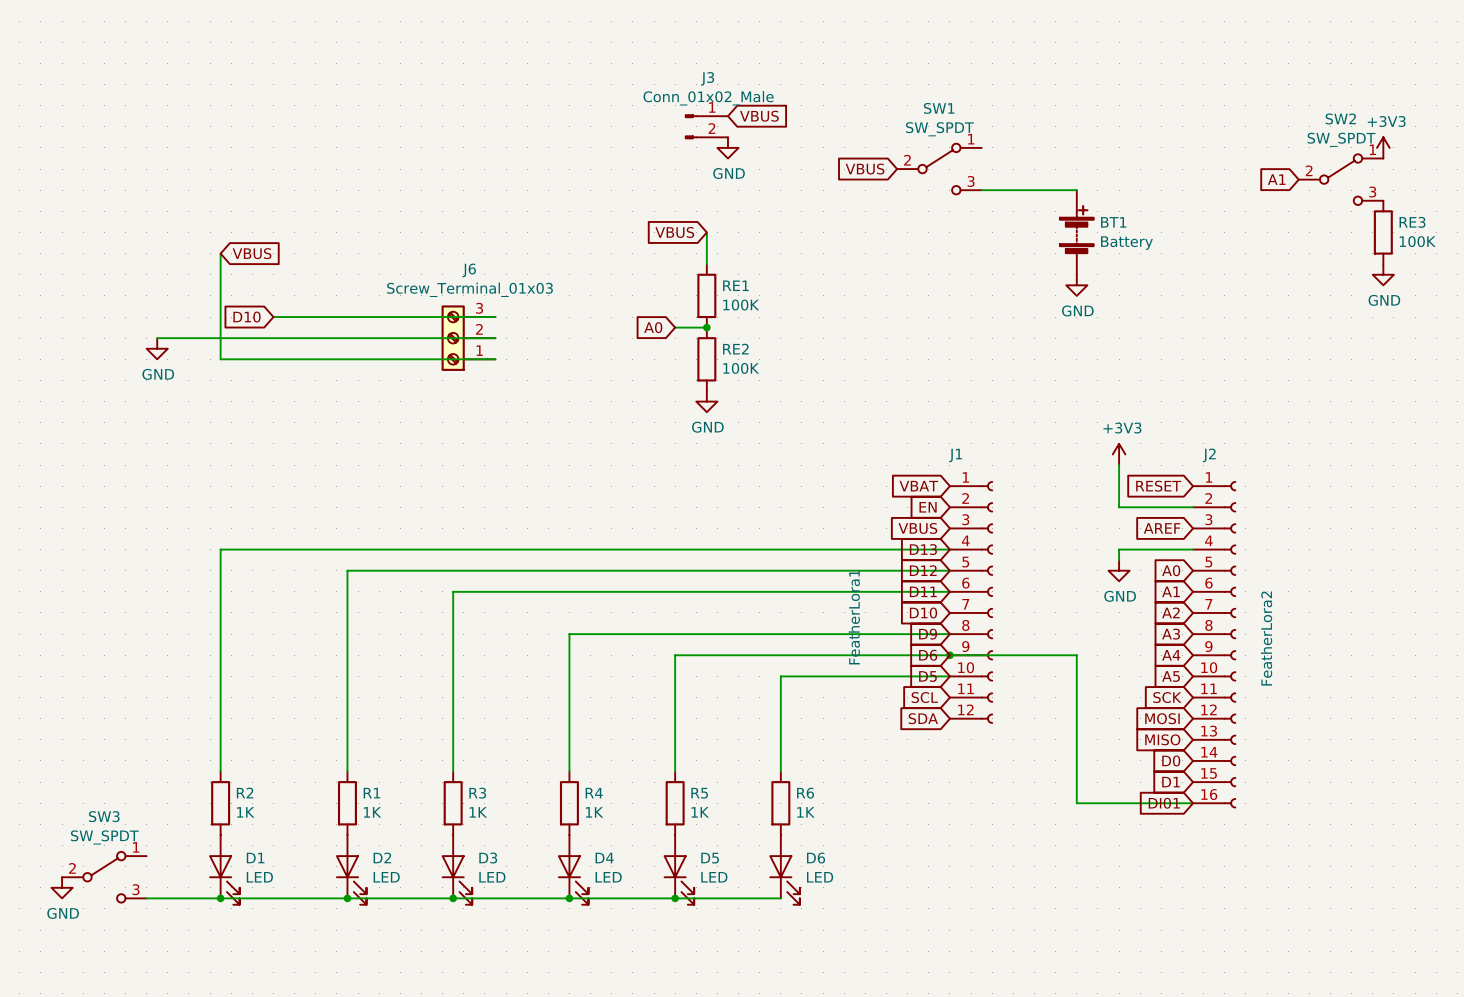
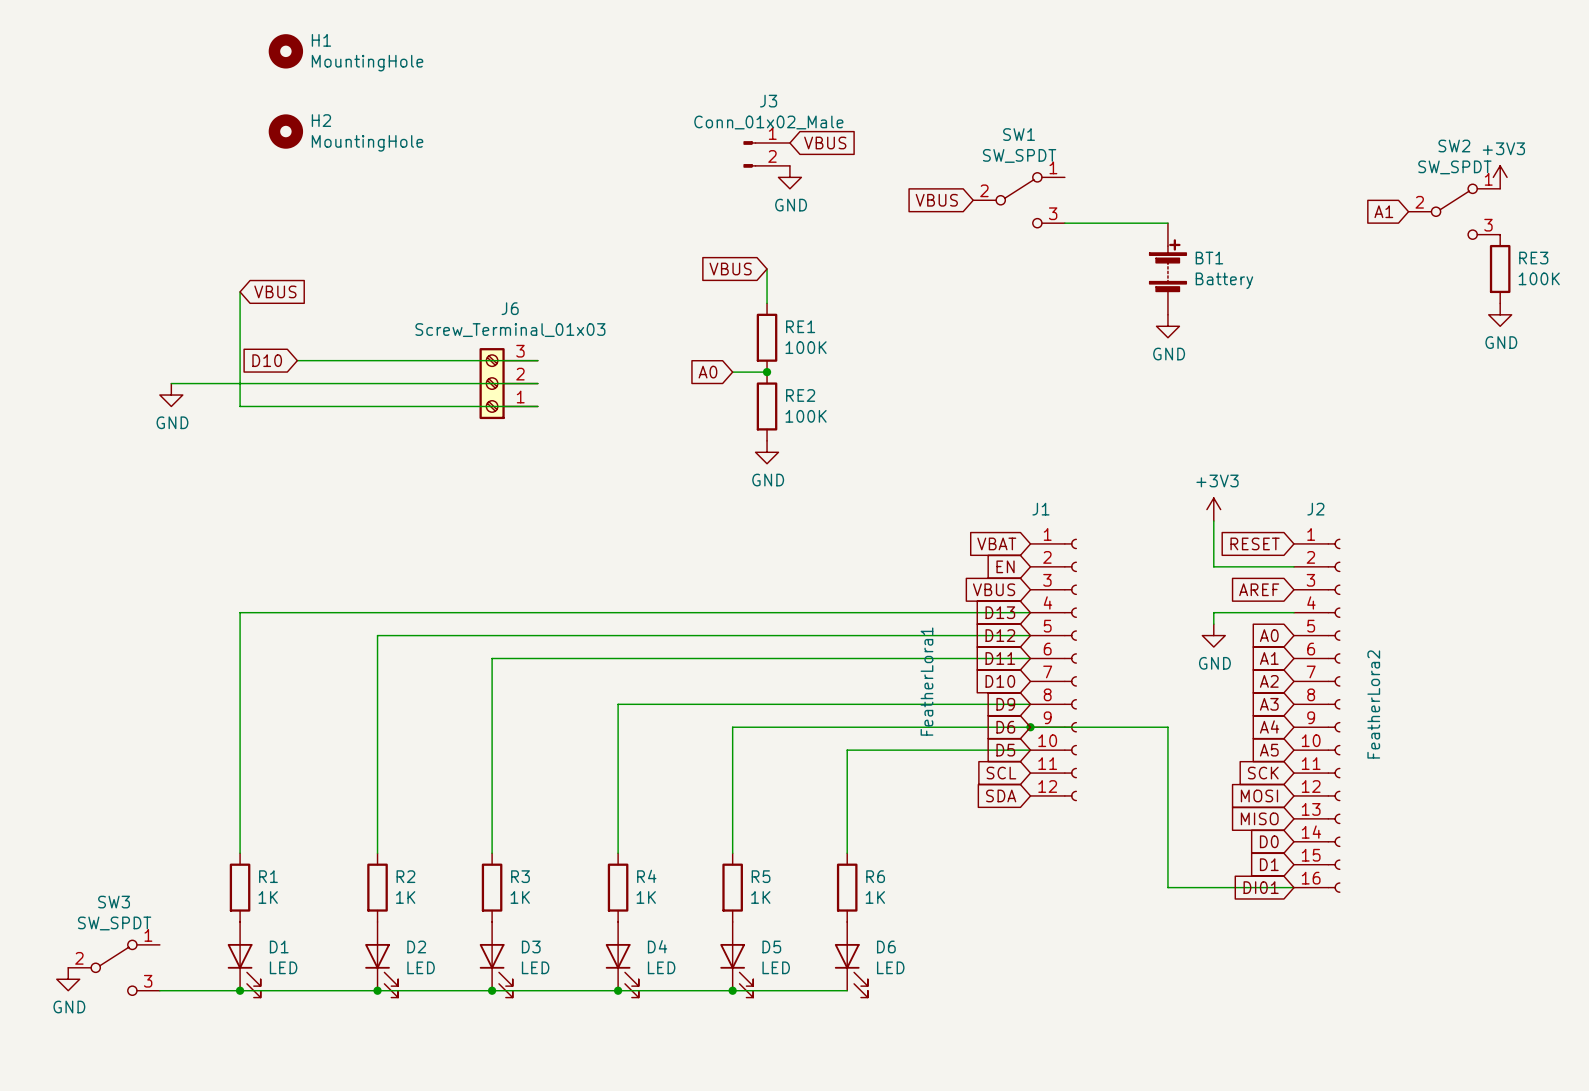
H1: none -> MountingHole (285, 51)
H2: none -> MountingHole (285, 131)
R2 name: R2 (245, 793) -> R1 (268, 876)
R1 name: R1 (371, 793) -> R2 (405, 876)

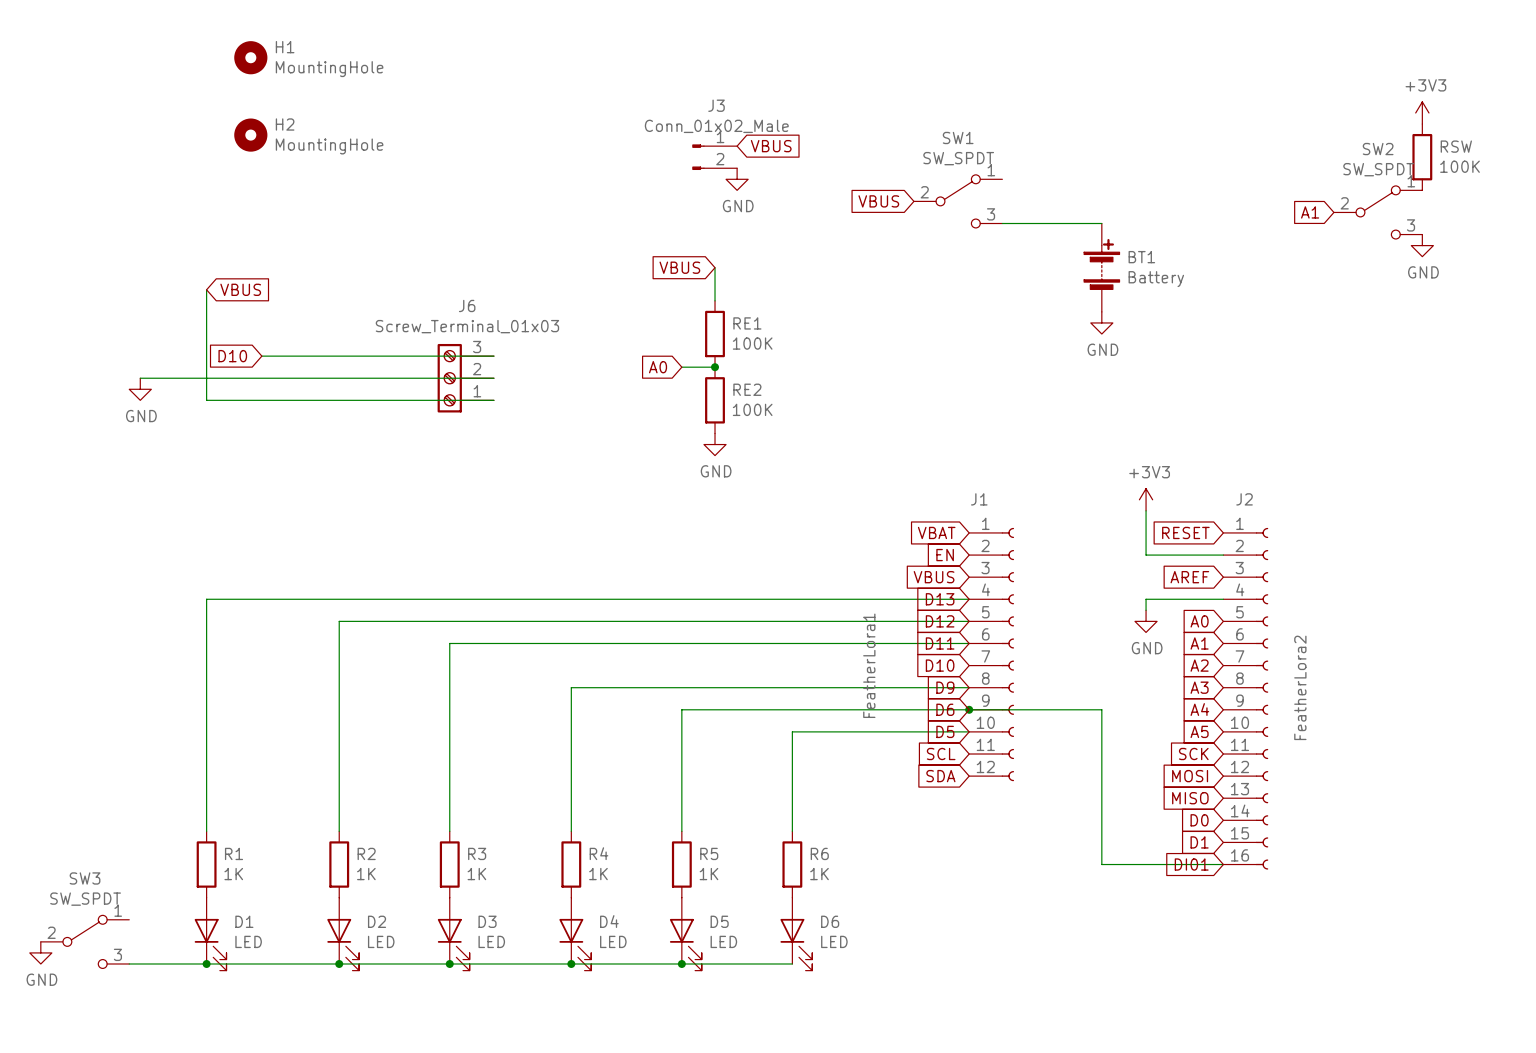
RSW: none -> 100K (1422, 157)
power symbol position: +3V3 (1500, 177) -> +3V3 (1422, 112)
RE3: 100K (1500, 269) -> none
power symbol position: GND (1500, 314) -> GND (1422, 245)

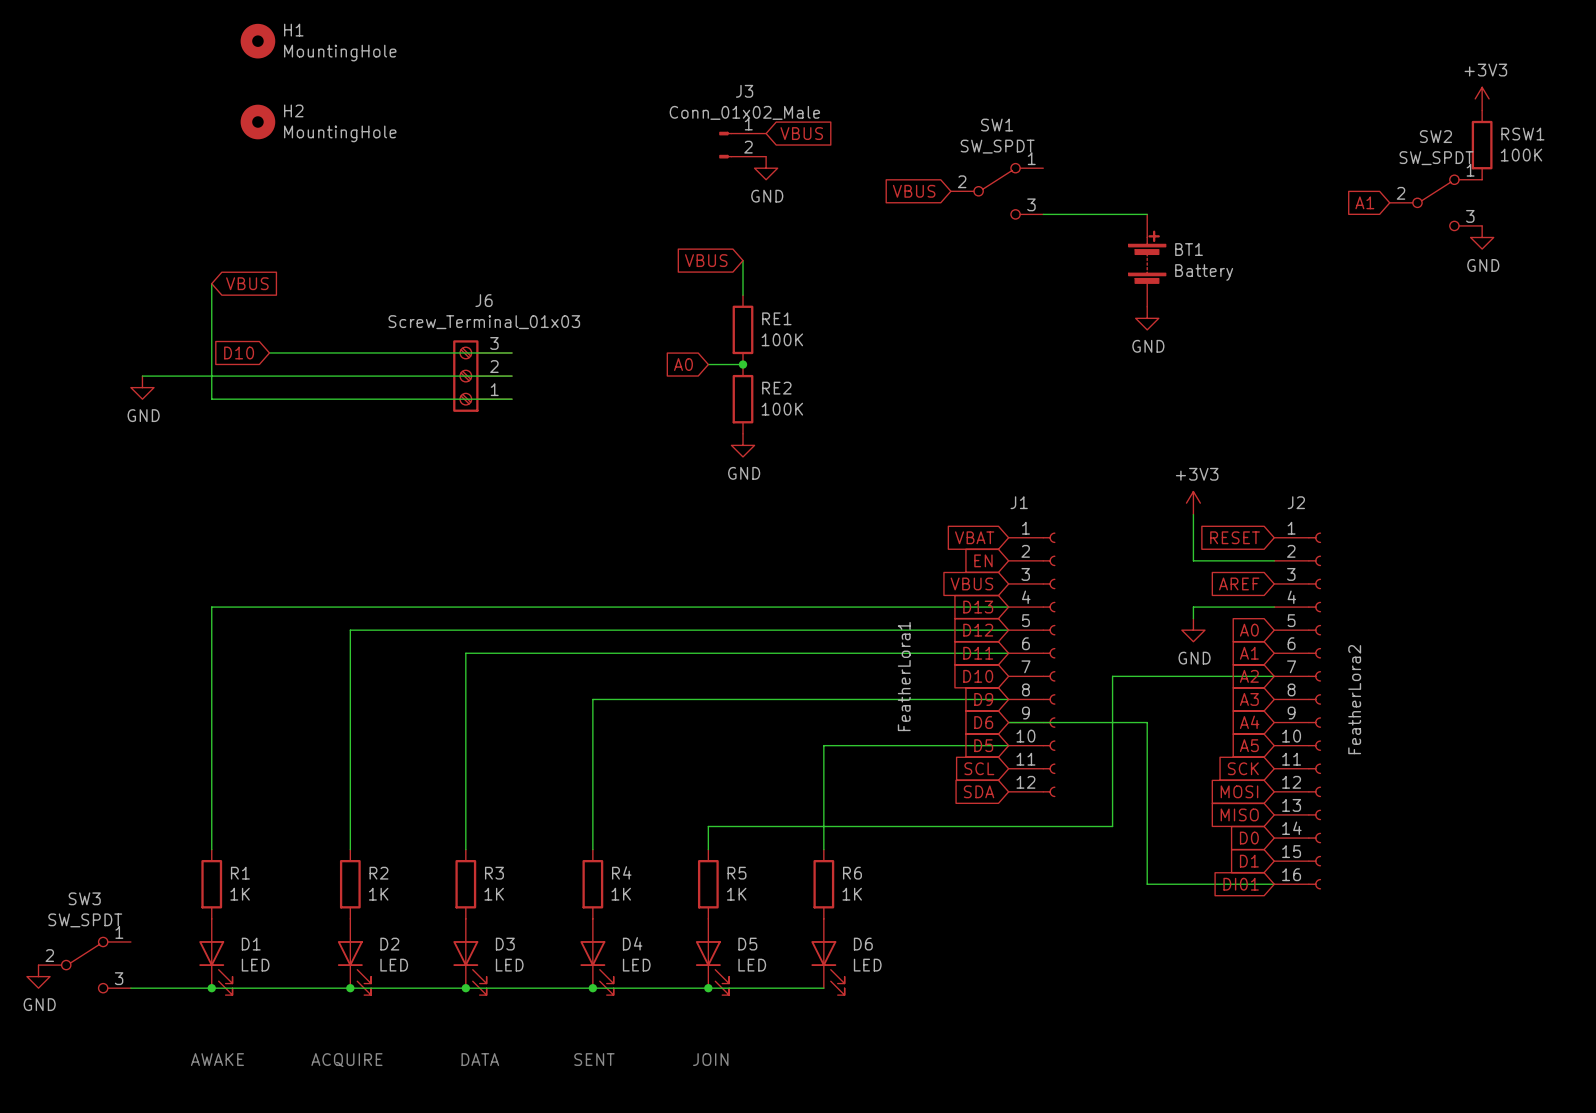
RSW name: RSW (1456, 146) -> RSW1 (1522, 134)
wire: (969, 709) (681, 709) (681, 809) -> (1274, 676) (1112, 676) (1112, 826) (708, 826)
junction: (969, 709) -> none
text: none -> AWAKE (217, 1059)
text: none -> ACQUIRE (346, 1060)
text: none -> DATA (480, 1059)
text: none -> SENT (594, 1059)
text: none -> JOIN (710, 1059)

